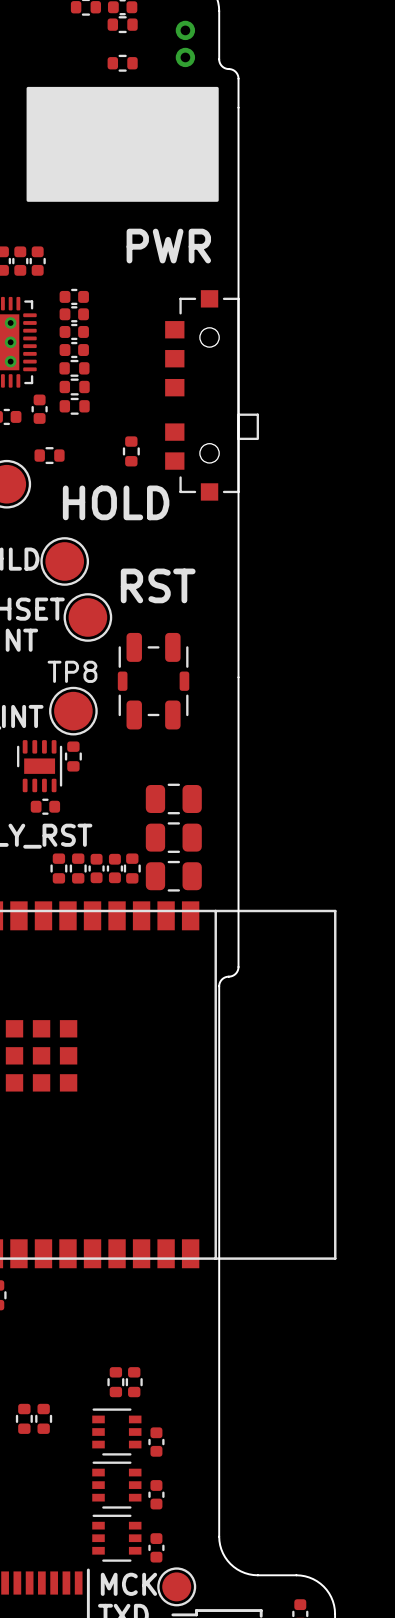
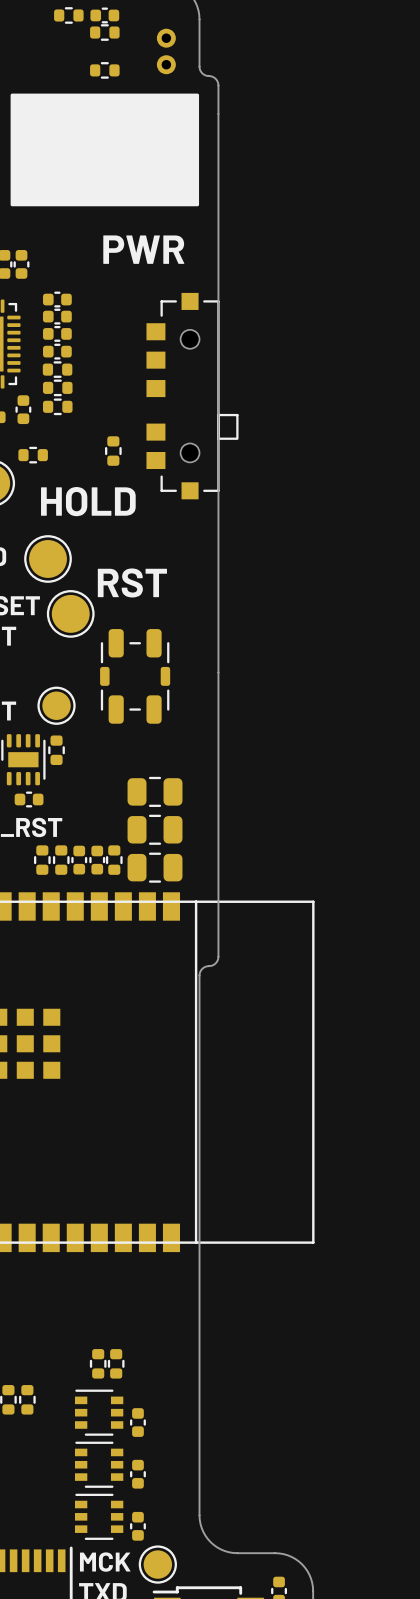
TP8: (73, 711) -> none
part: none -> (56, 705)

